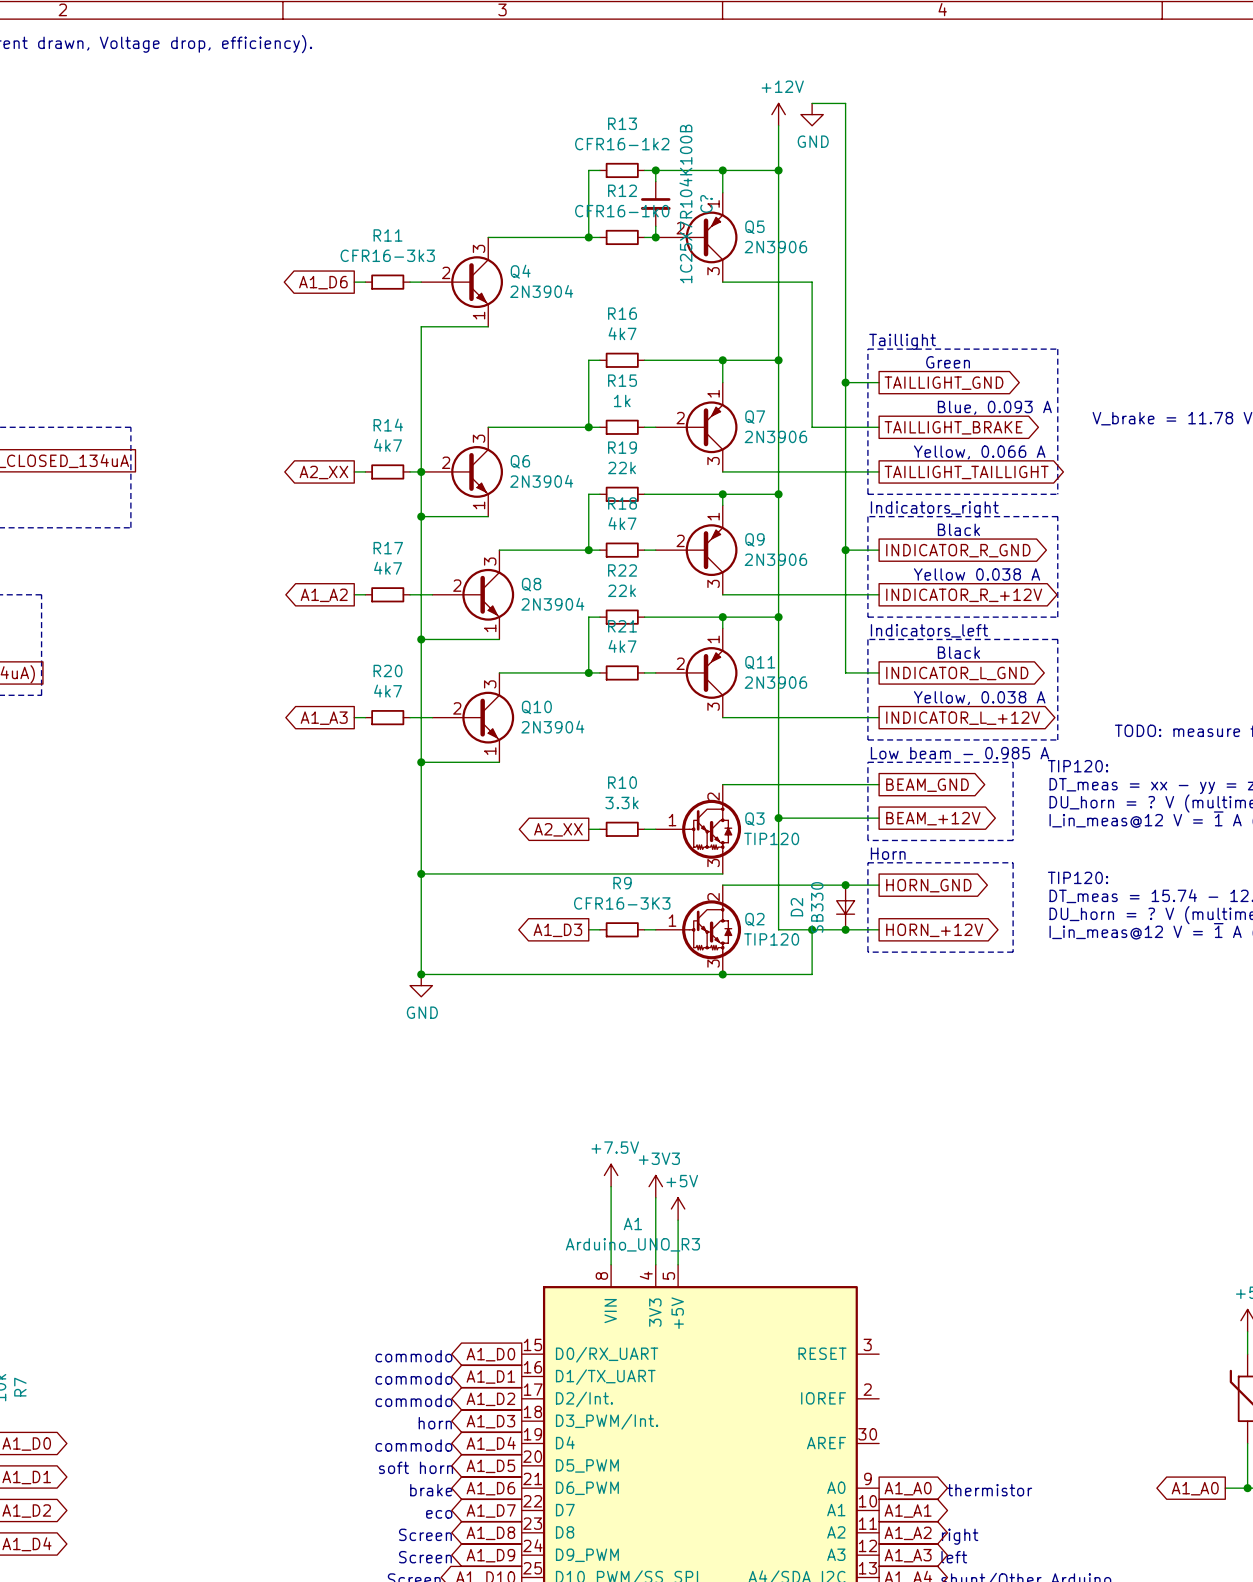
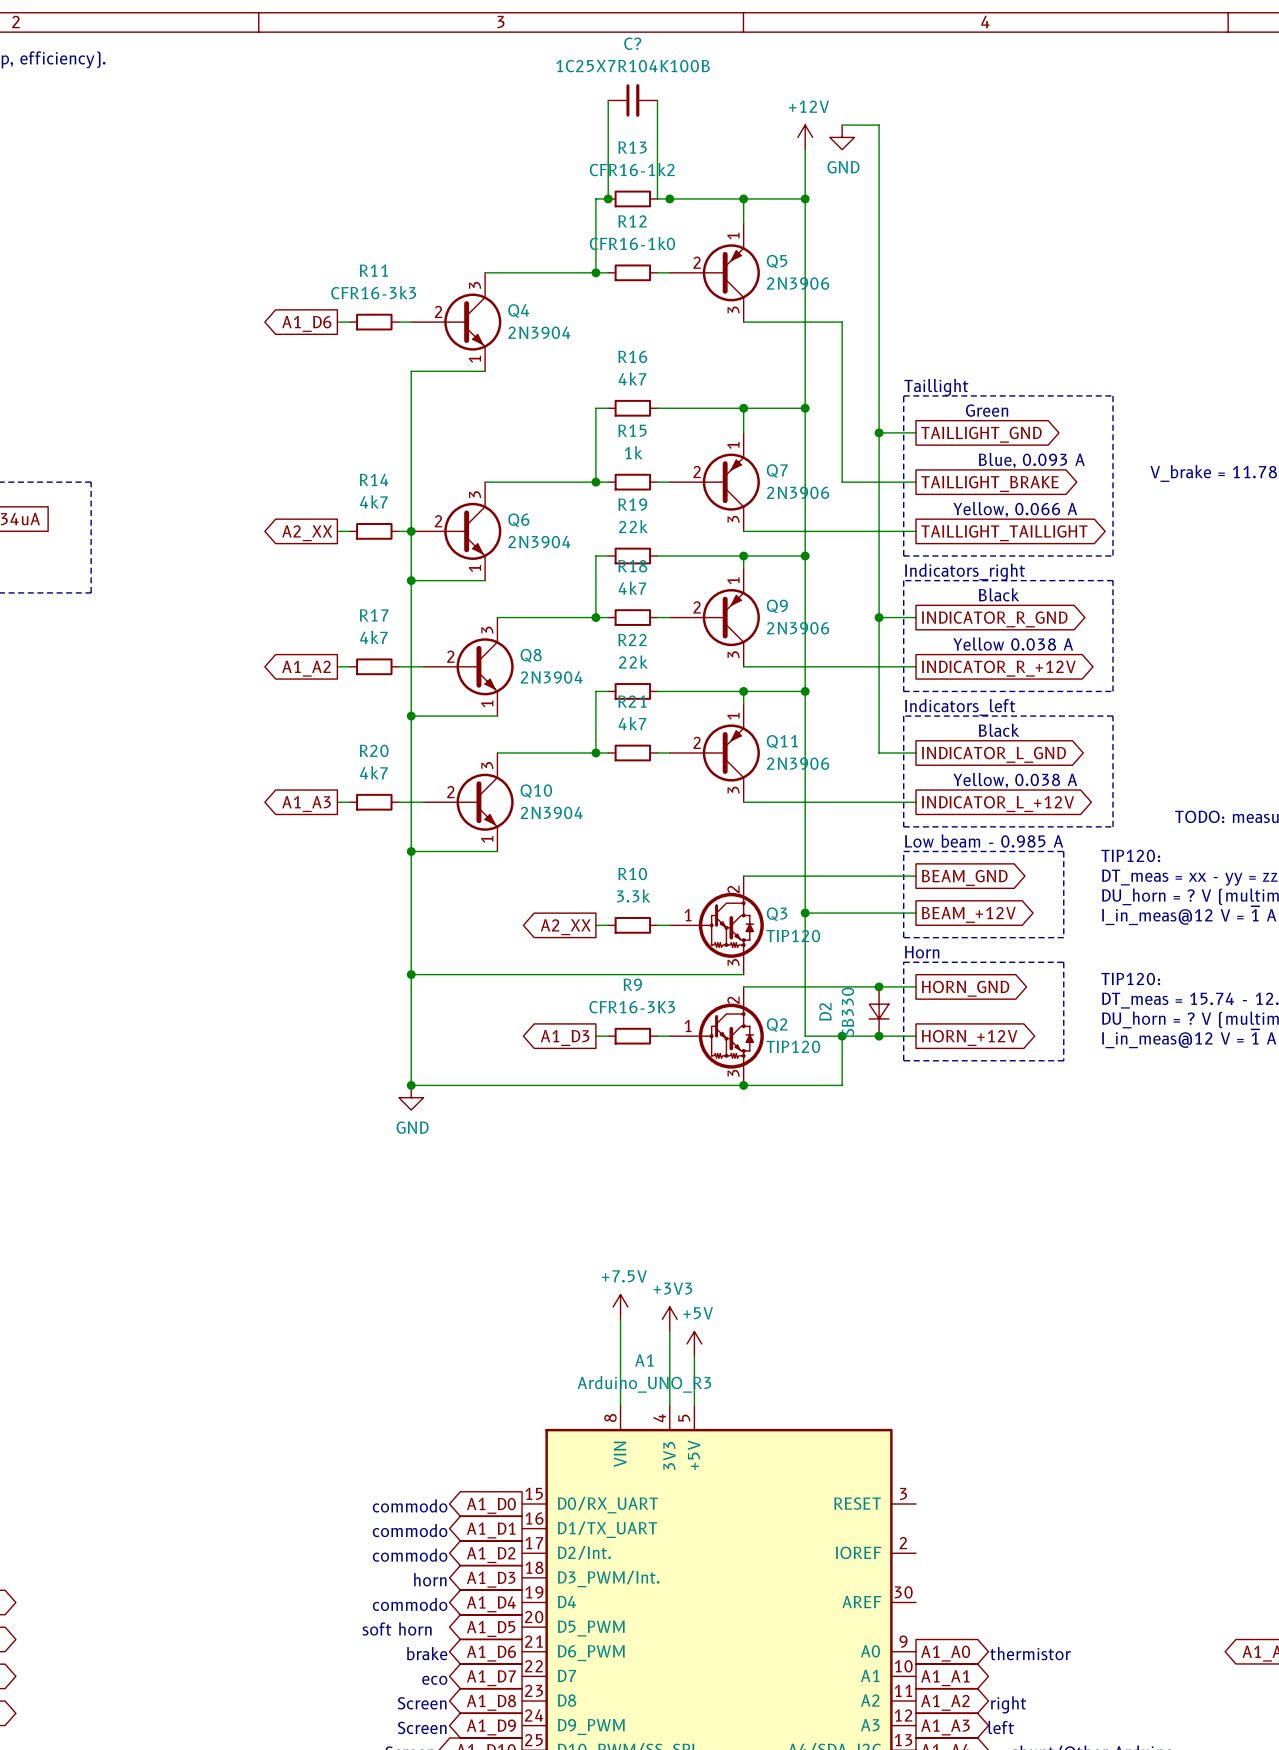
wire: none -> (608, 100) (608, 198)
wire: none -> (657, 100) (657, 198)
junction: none -> (608, 198)
wire: (655, 170) (655, 181) -> none
C? position: (655, 203) -> (632, 100)
C? rotation: 0° (655, 204) -> 90° counterclockwise (632, 100)
wire: (655, 226) (655, 237) -> none
junction: (655, 237) -> none

